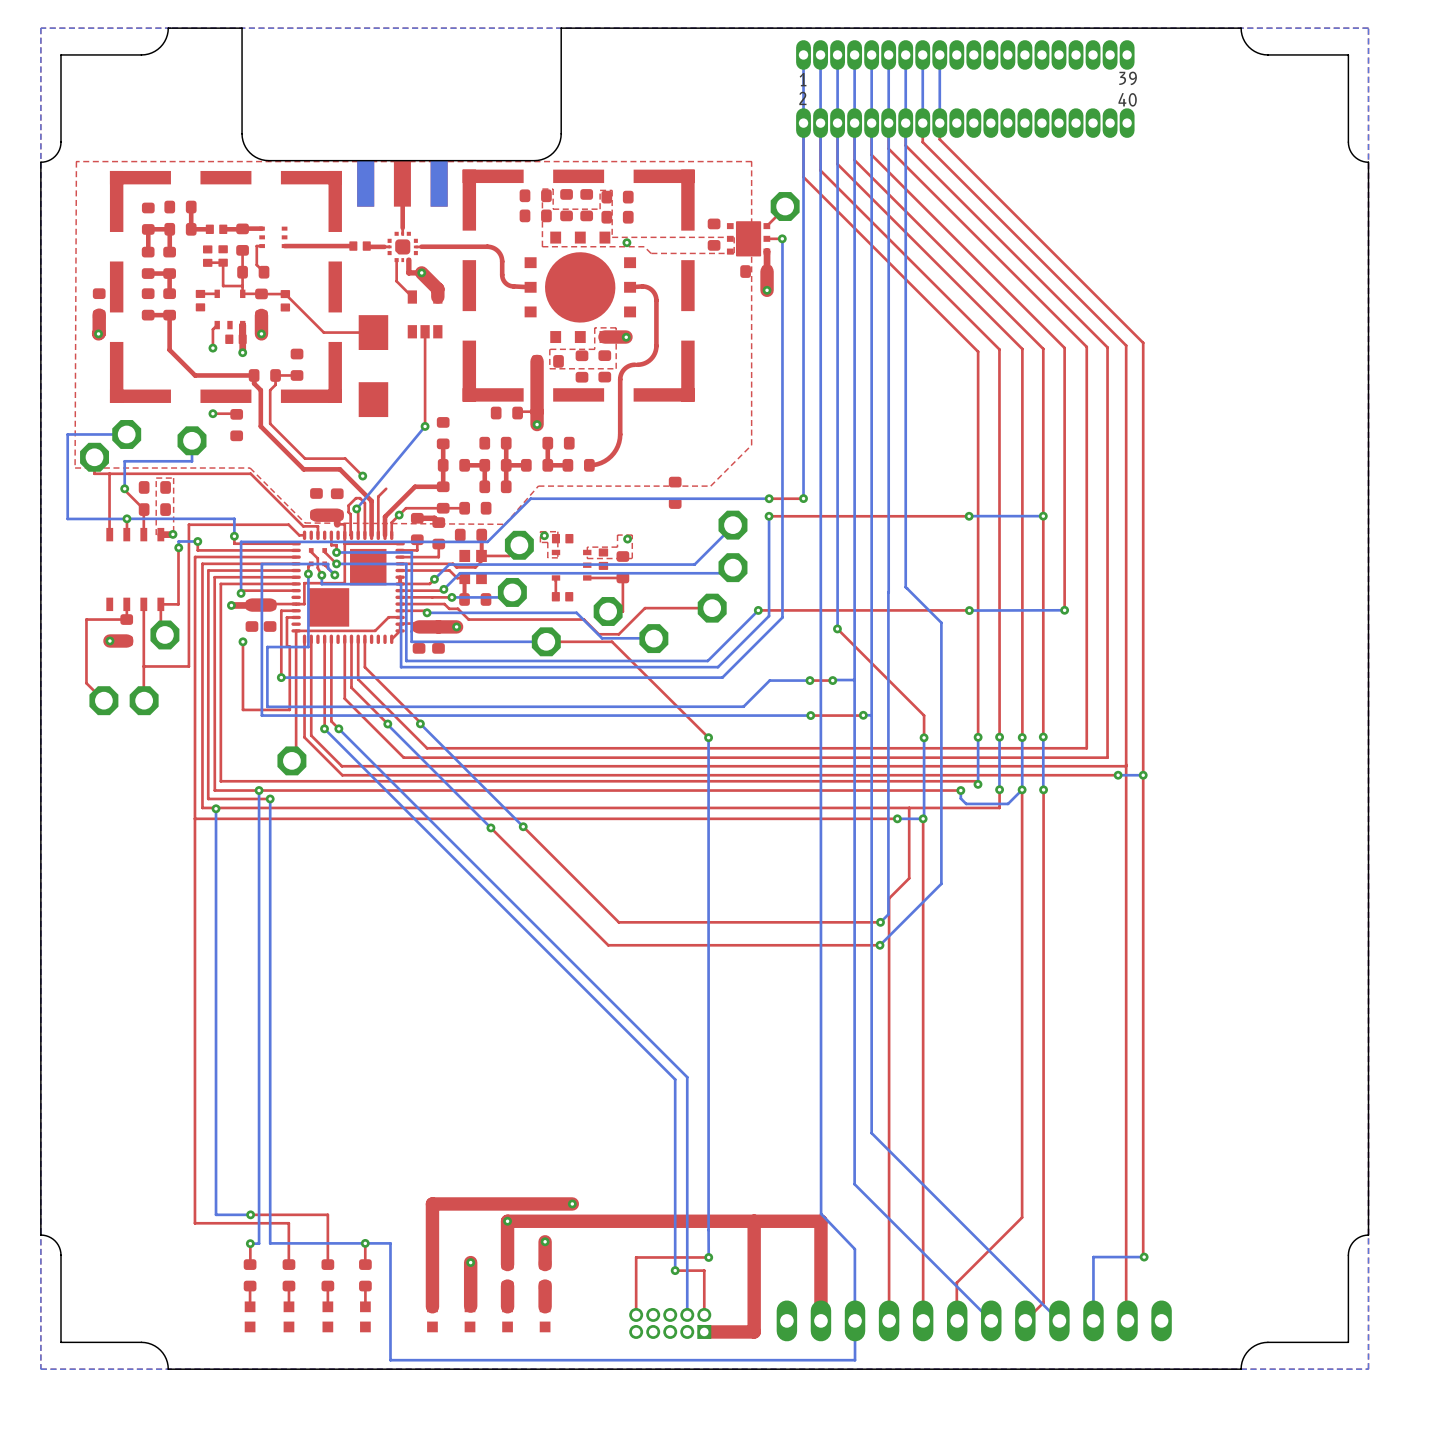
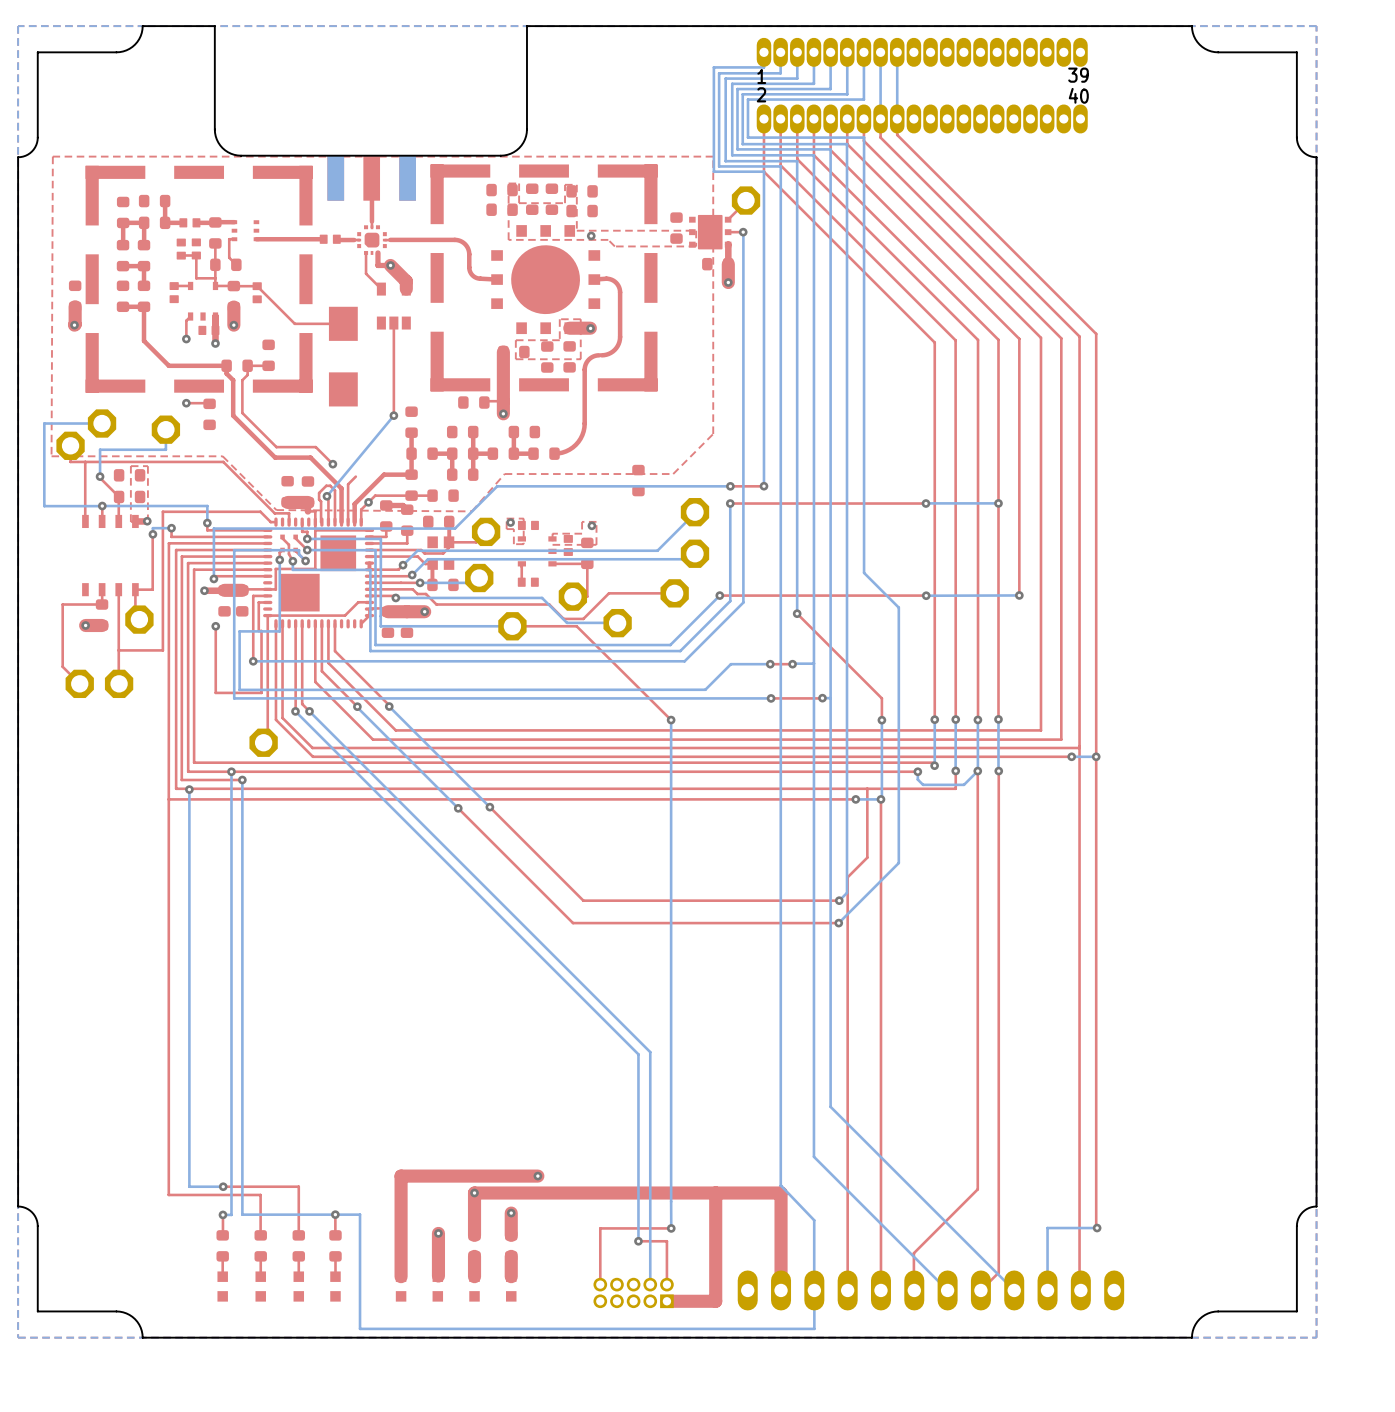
bottom track: (820, 54) (821, 1213) -> (780, 52) (780, 73) (719, 73) (719, 166) (780, 166) (781, 1185)
bottom track: (803, 70) (803, 177) -> (763, 67) (713, 67) (713, 171) (763, 171)
bottom track: (837, 81) (837, 628) -> (797, 78) (725, 78) (725, 161) (797, 161) (797, 613)
bottom track: (854, 87) (854, 160) -> (813, 83) (732, 83) (732, 155) (813, 155)
bottom track: (871, 92) (871, 154) -> (830, 89) (737, 89) (737, 149) (830, 149)
bottom track: (888, 97) (888, 592) -> (847, 94) (742, 94) (742, 144) (847, 144) (847, 578)
bottom track: (905, 103) (907, 588) -> (863, 99) (747, 99) (747, 137) (864, 137) (865, 574)

